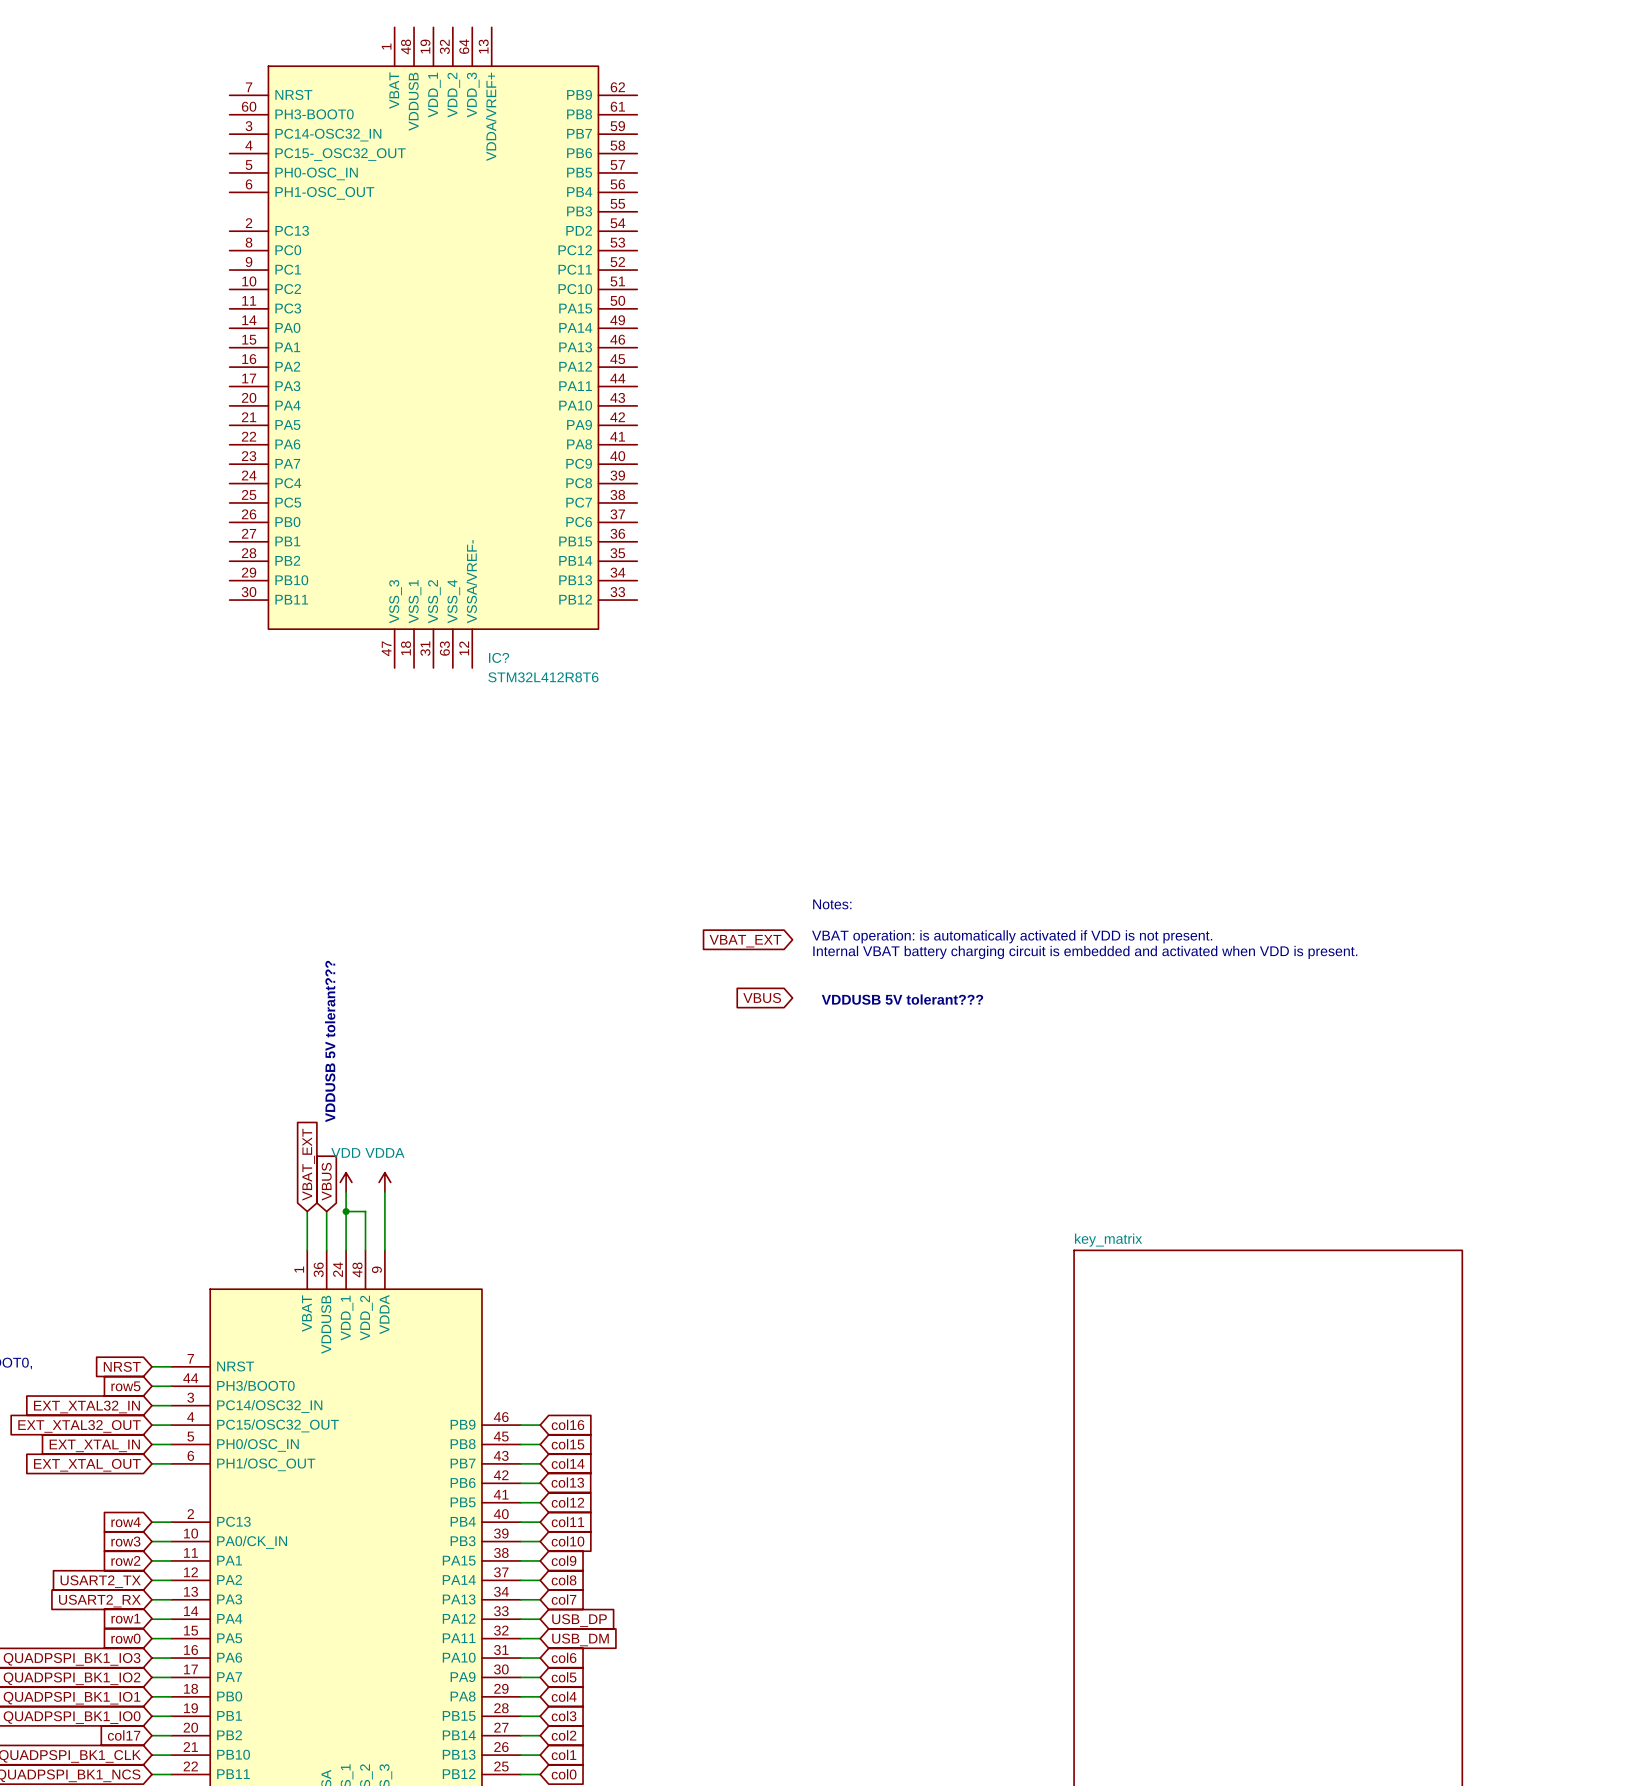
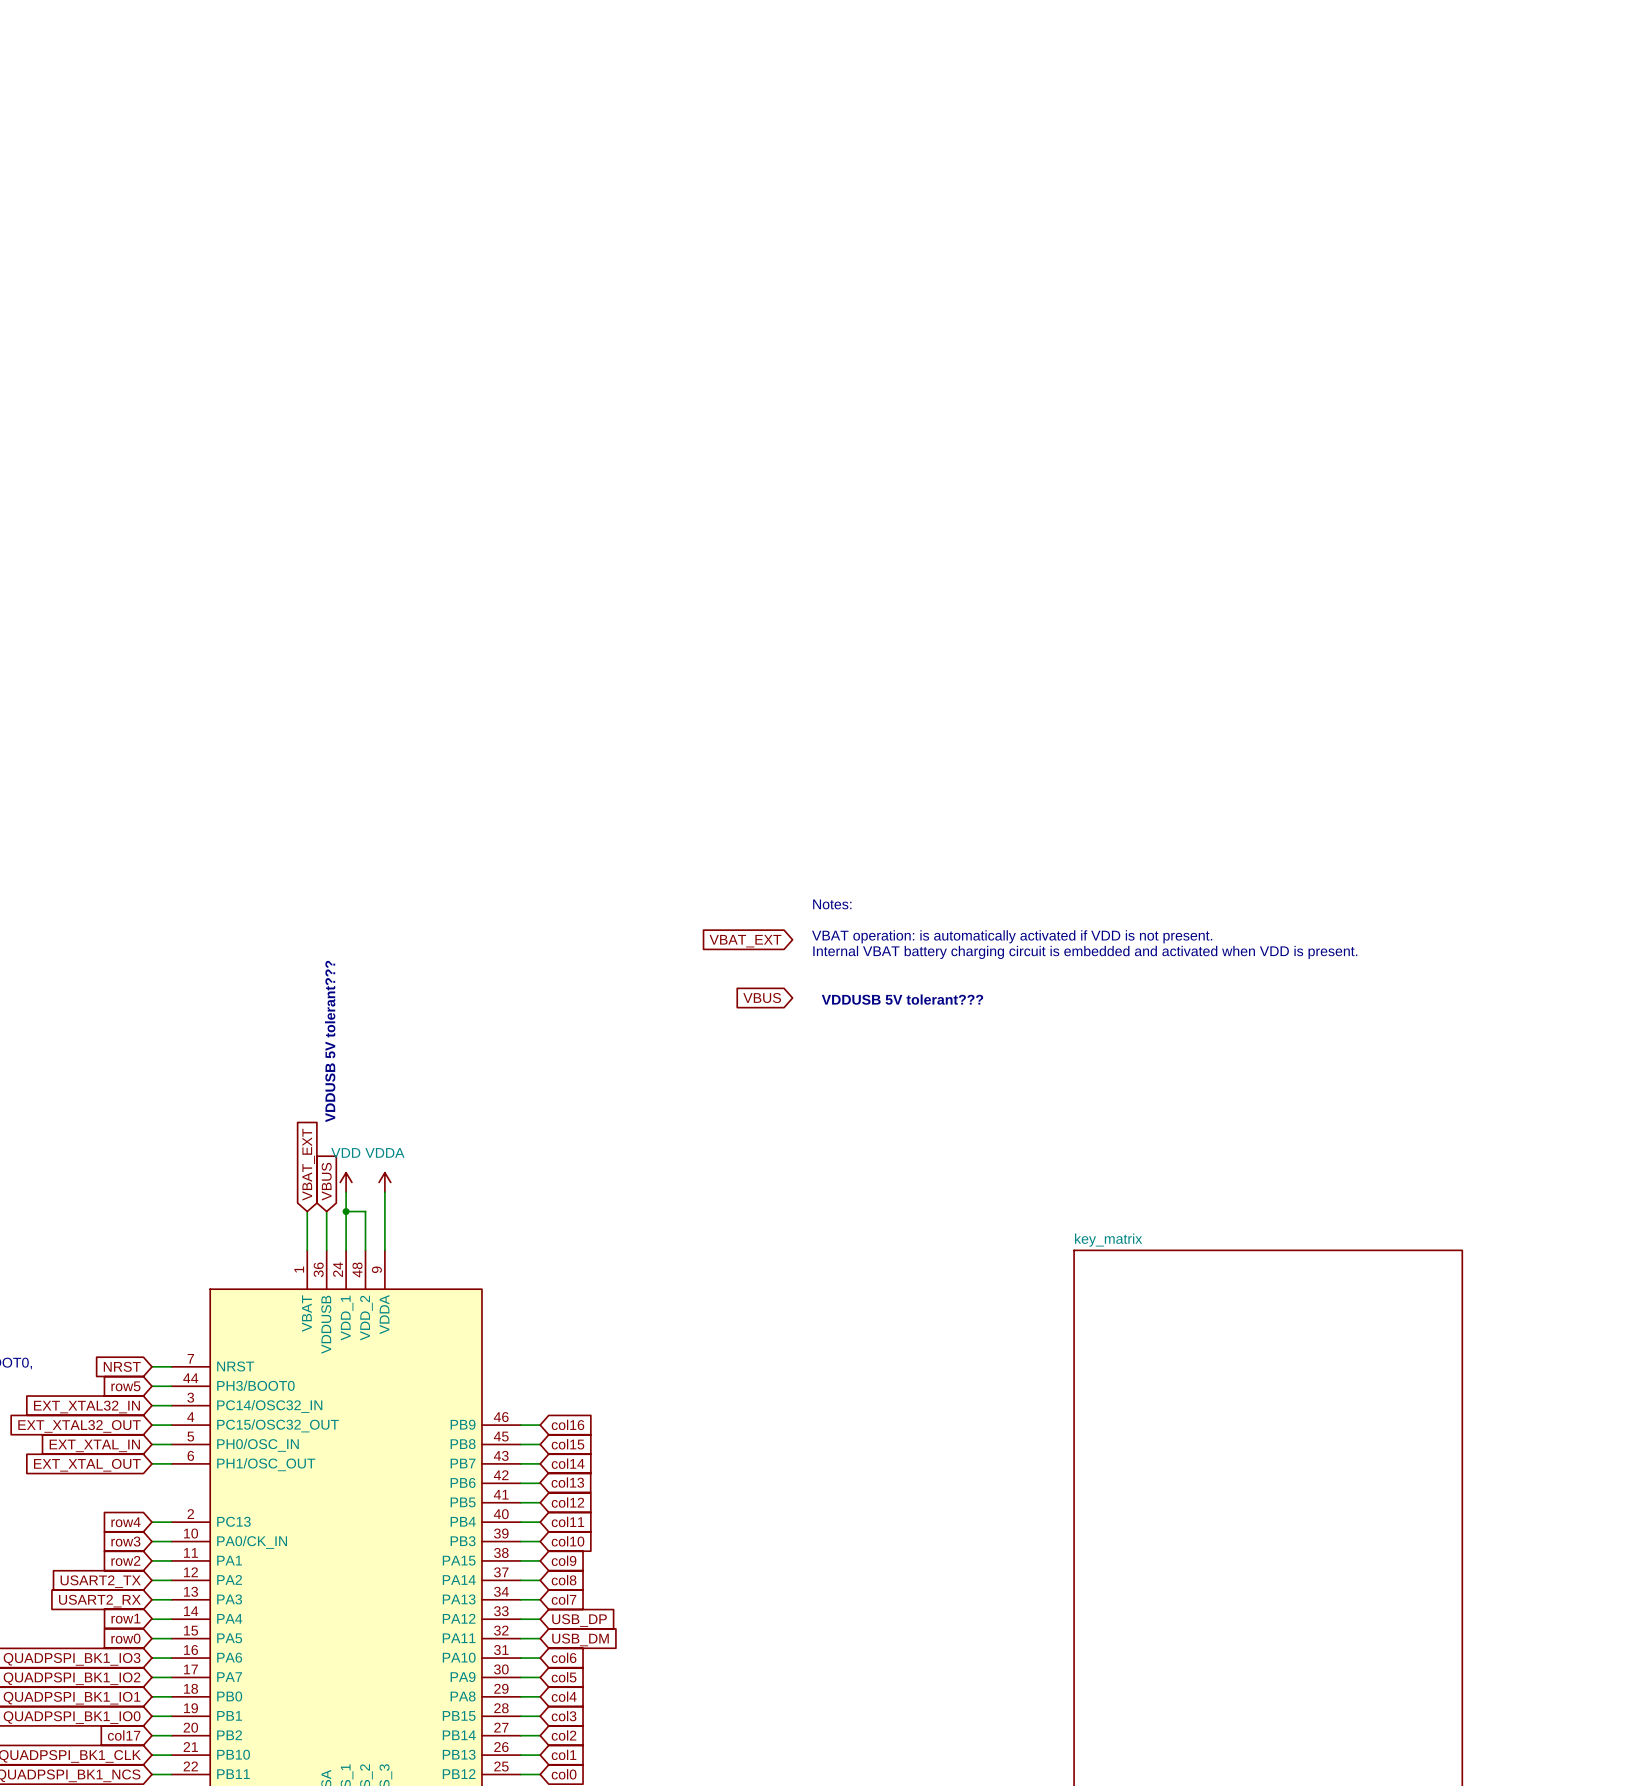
IC?: STM32L412R8T6 (433, 347) -> none

